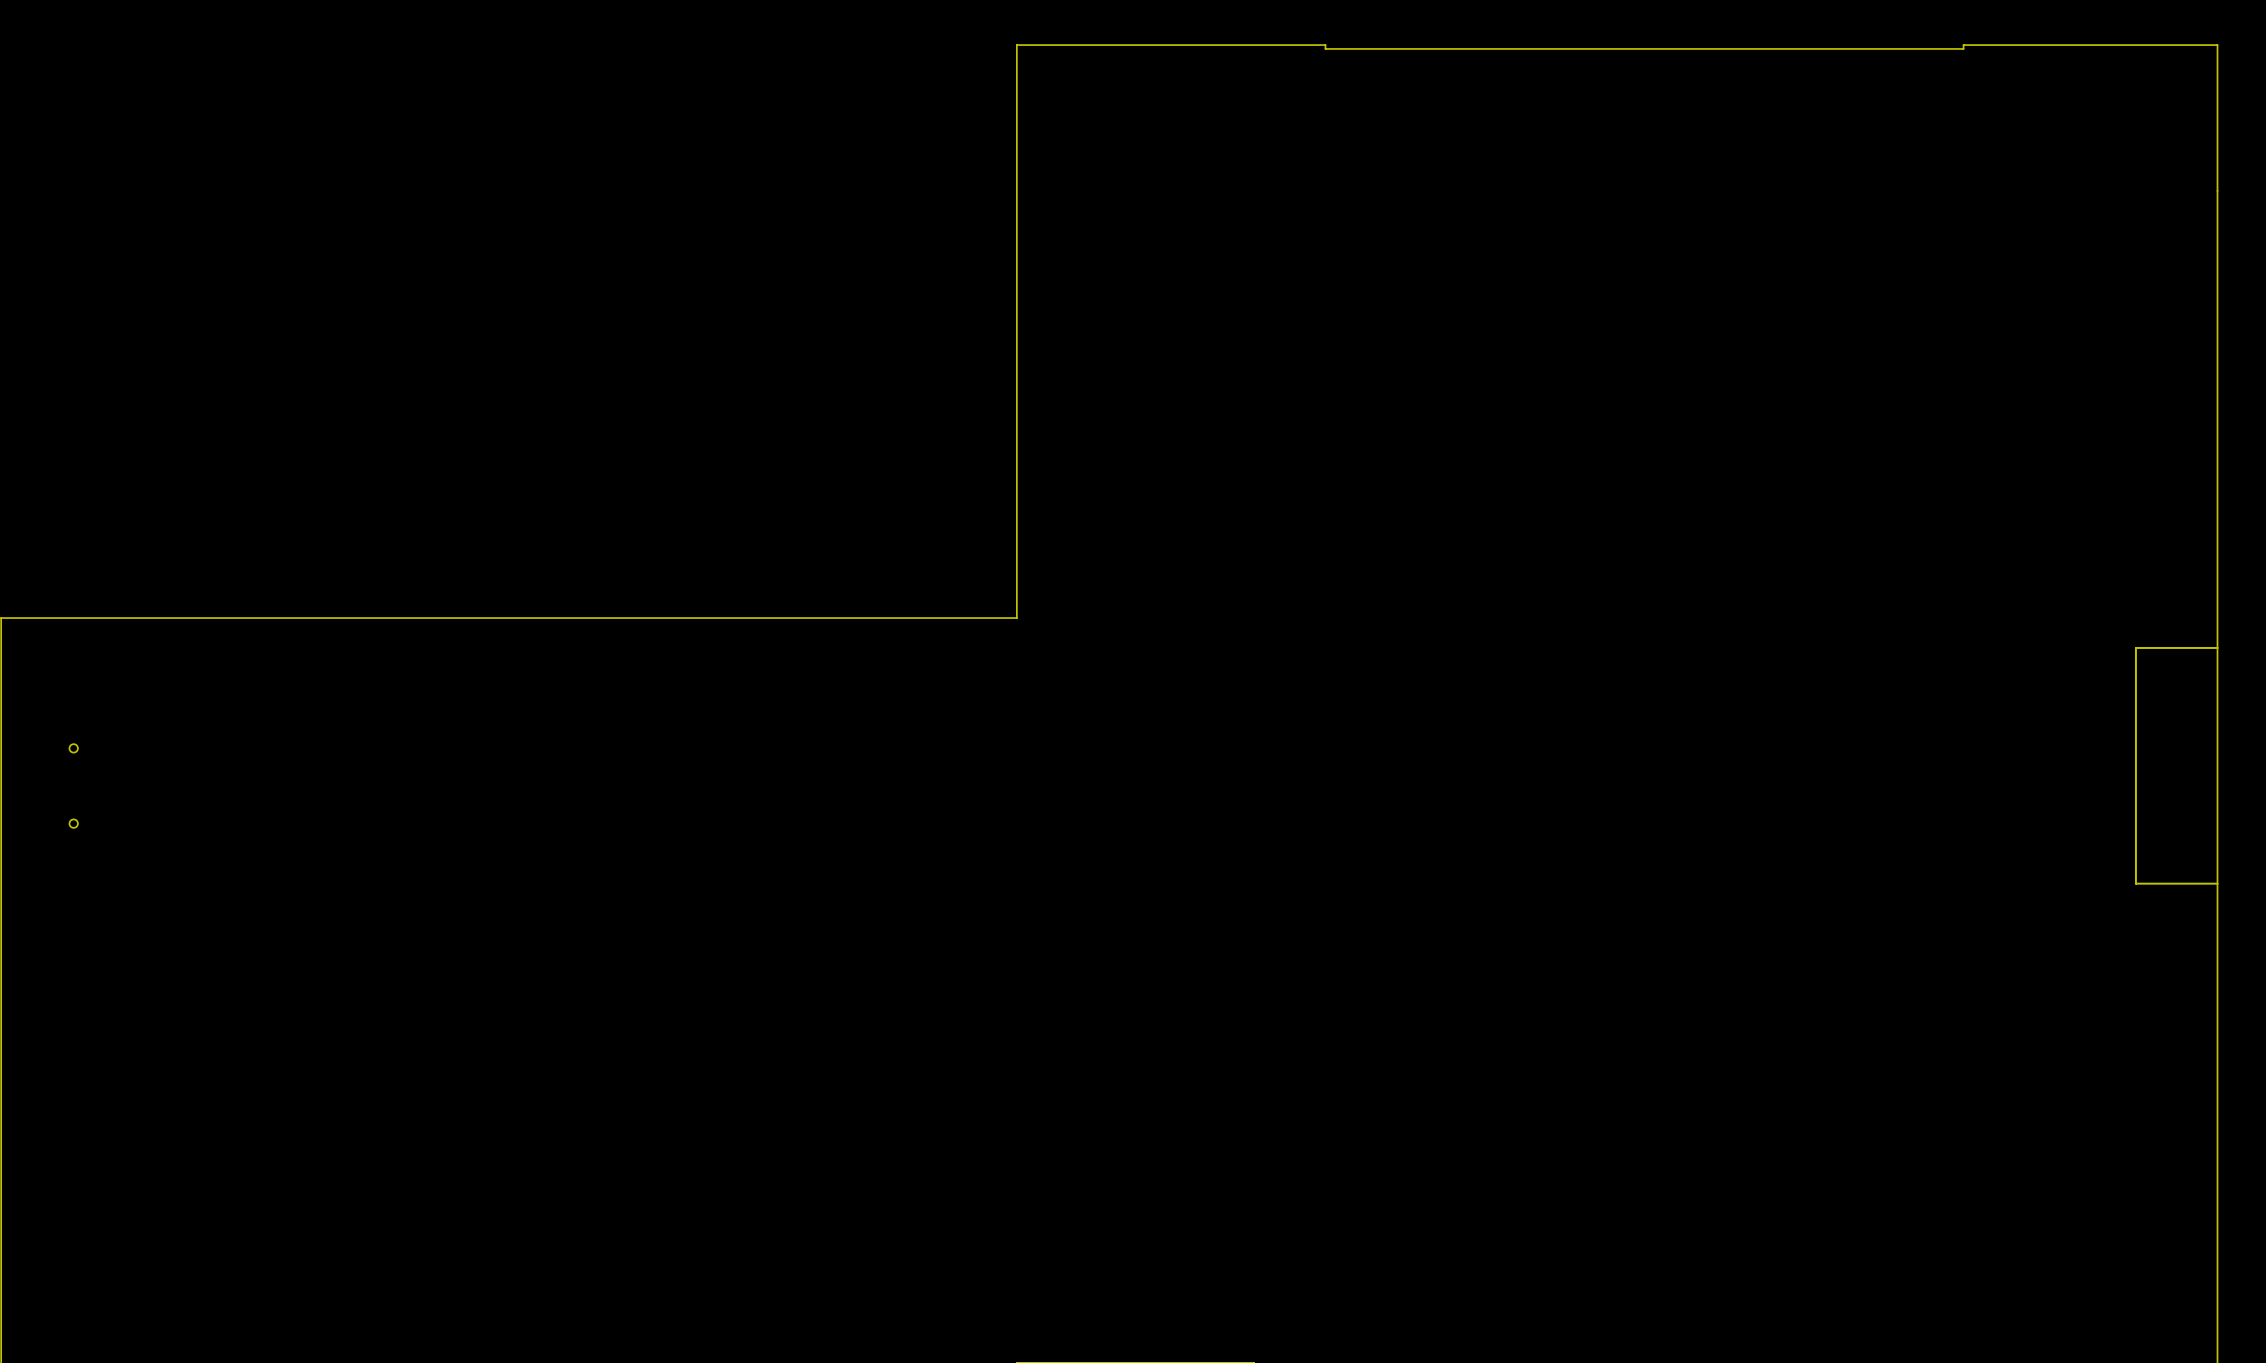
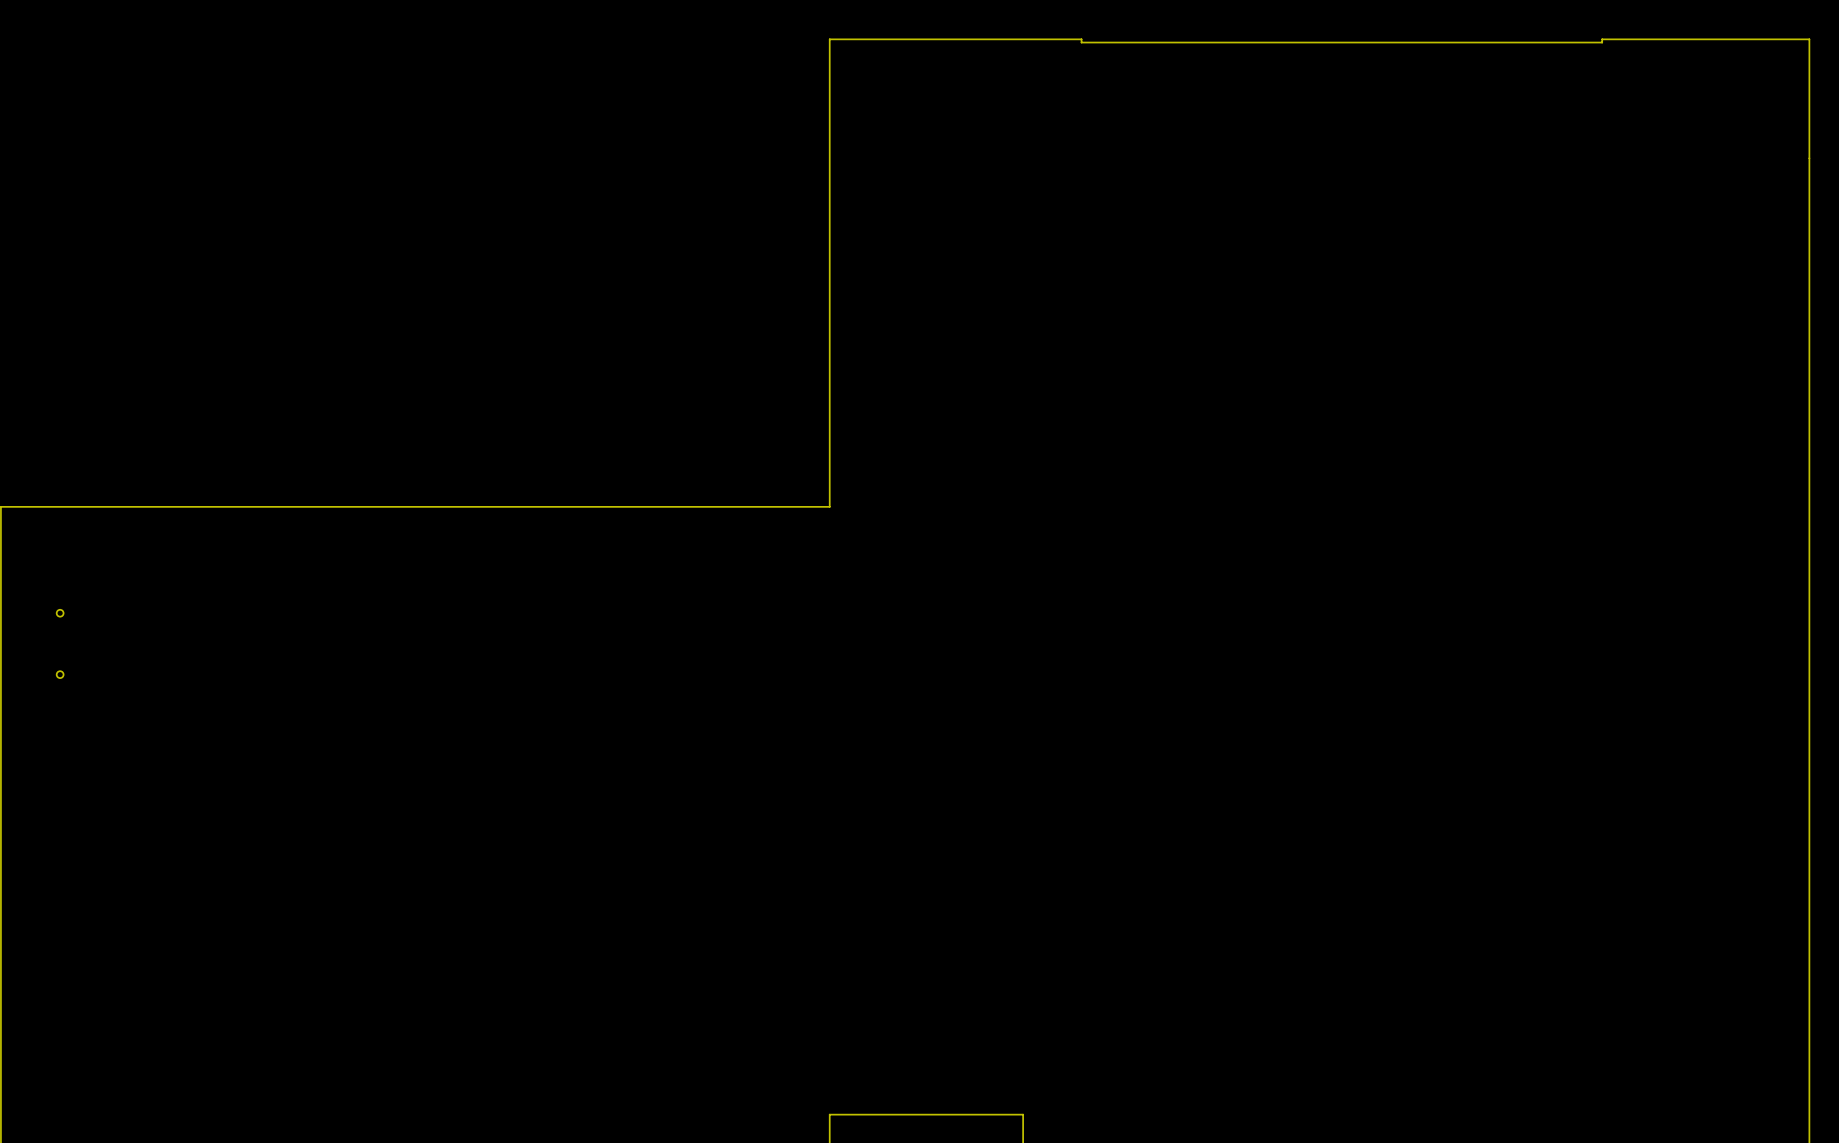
board edge: (2217, 647) (2135, 647) (2135, 883) (2217, 883) -> none

